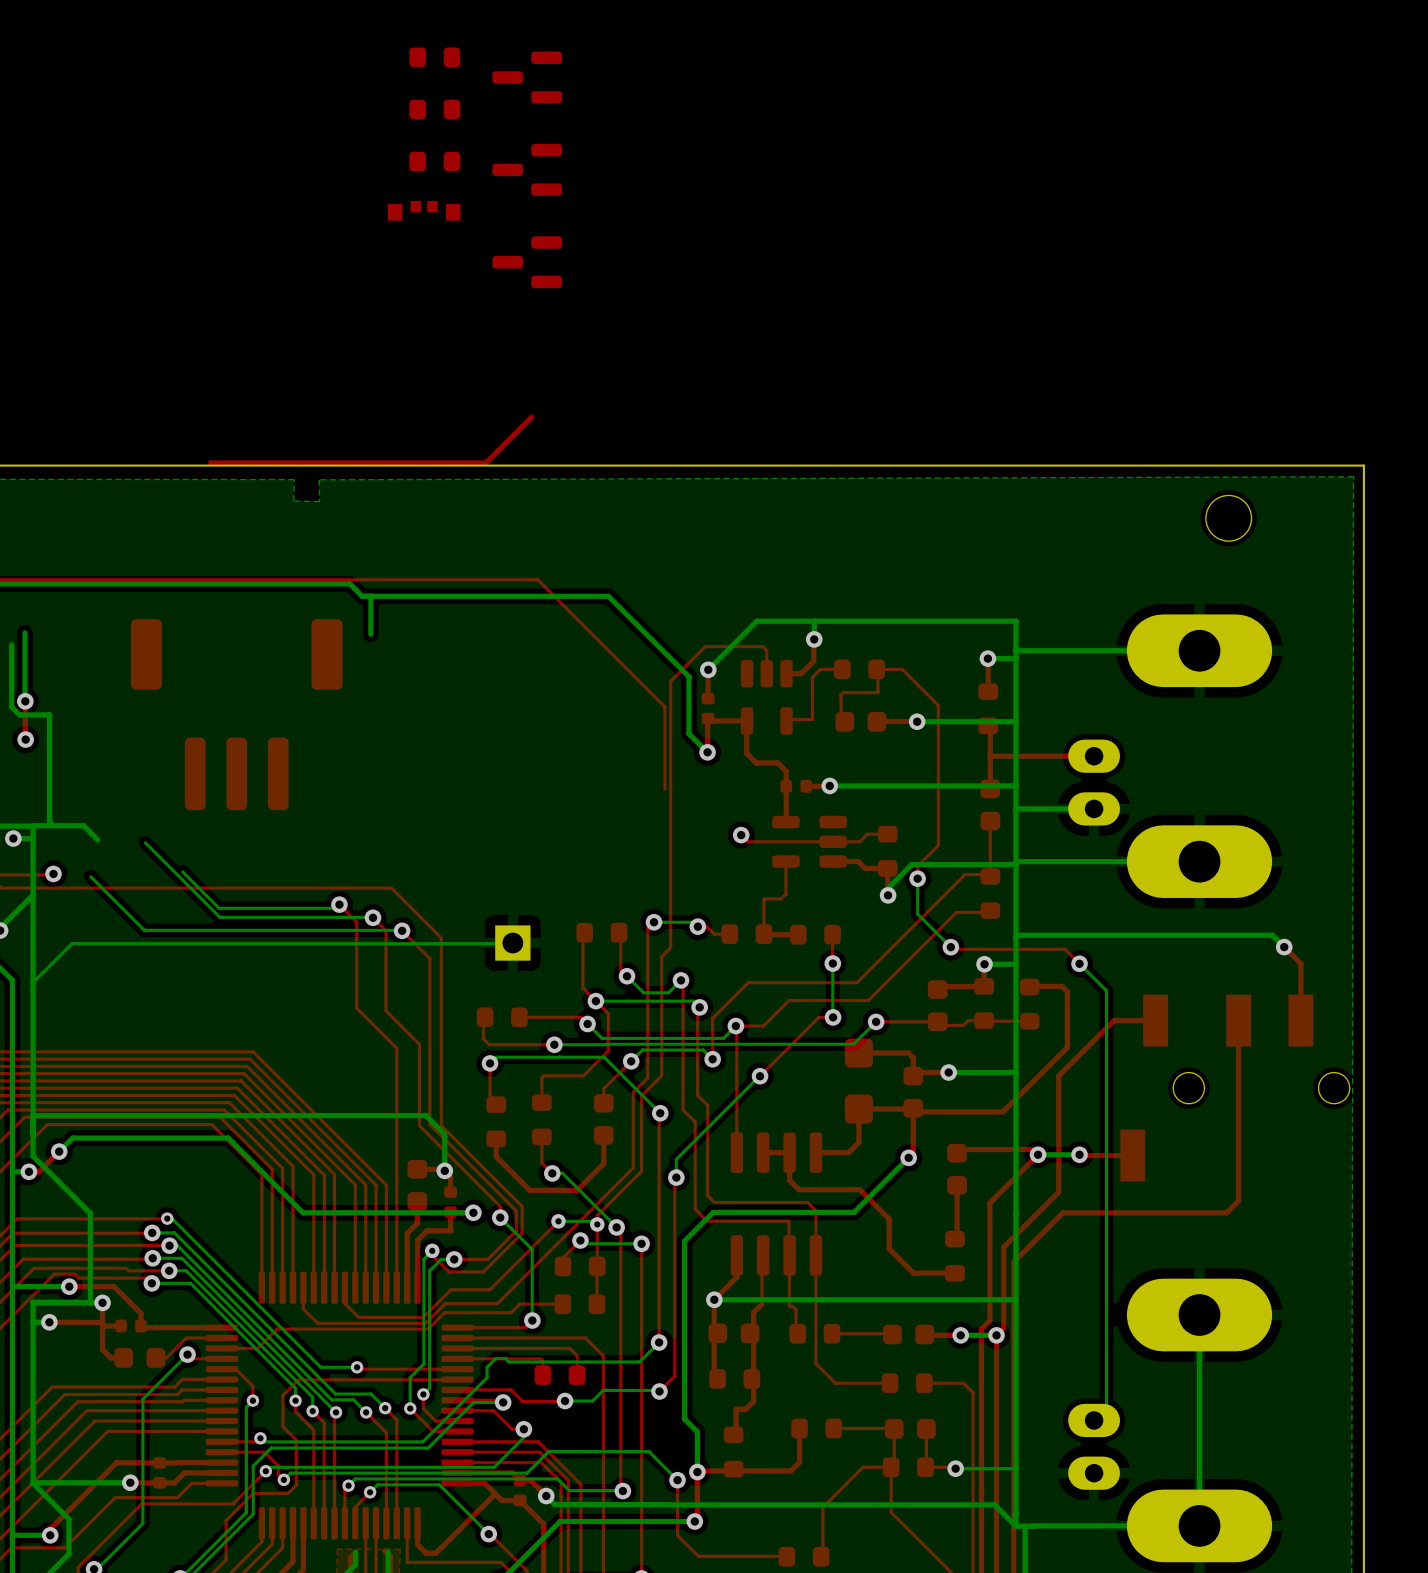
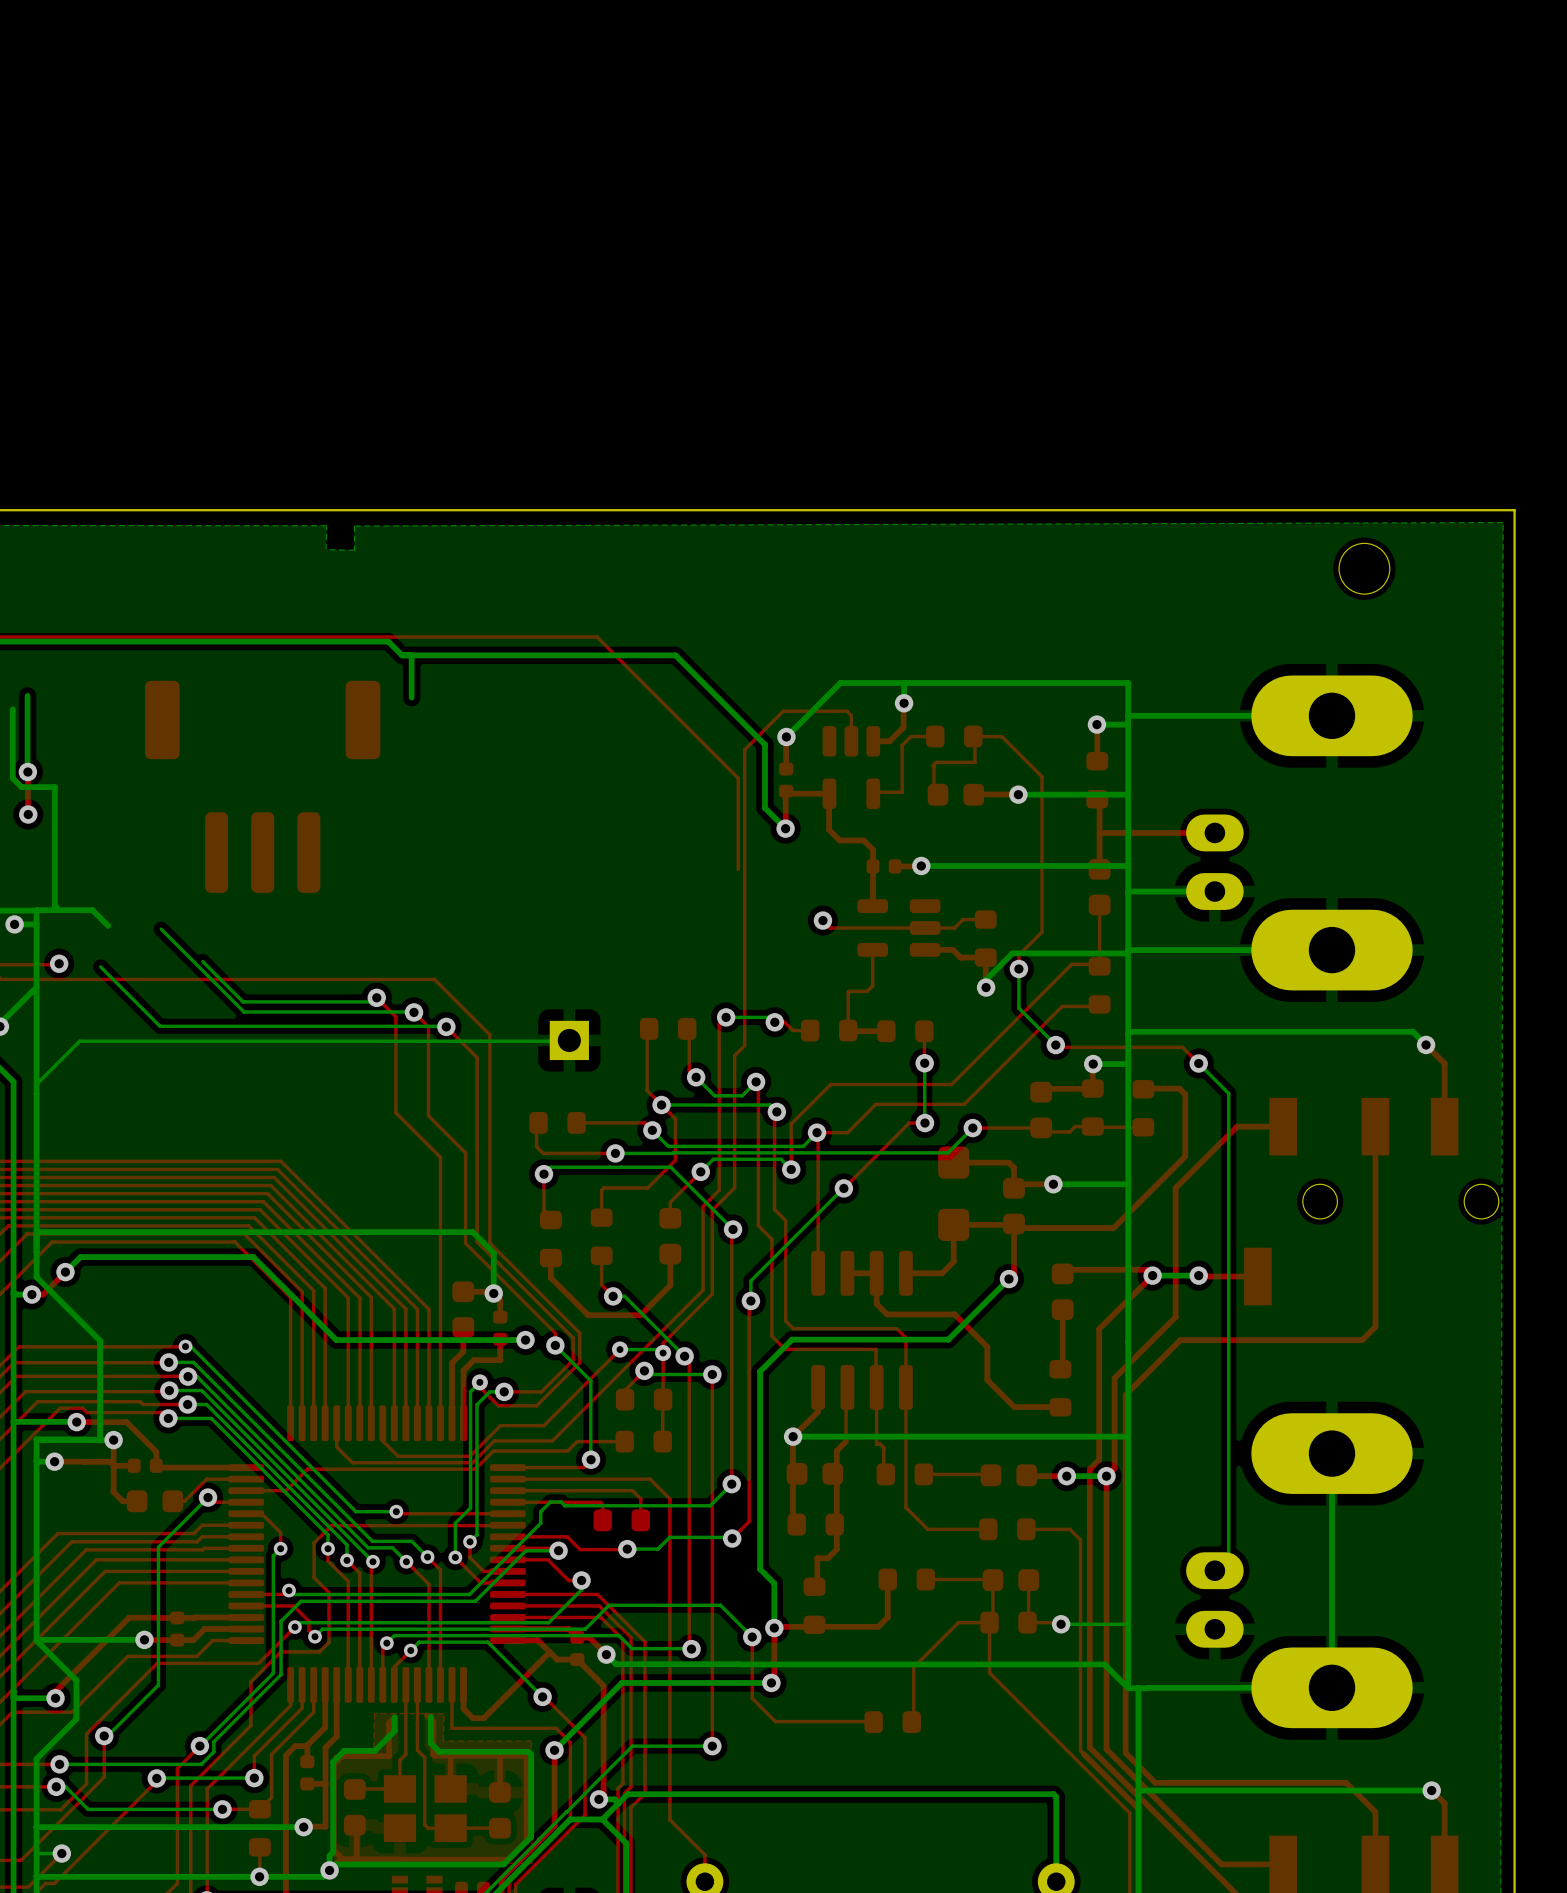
part: (434, 57) -> none
part: (527, 77) -> none
part: (434, 109) -> none
part: (434, 161) -> none
part: (527, 169) -> none
part: (424, 210) -> none
part: (527, 262) -> none
top track: (531, 417) (485, 462) (210, 462) -> none

